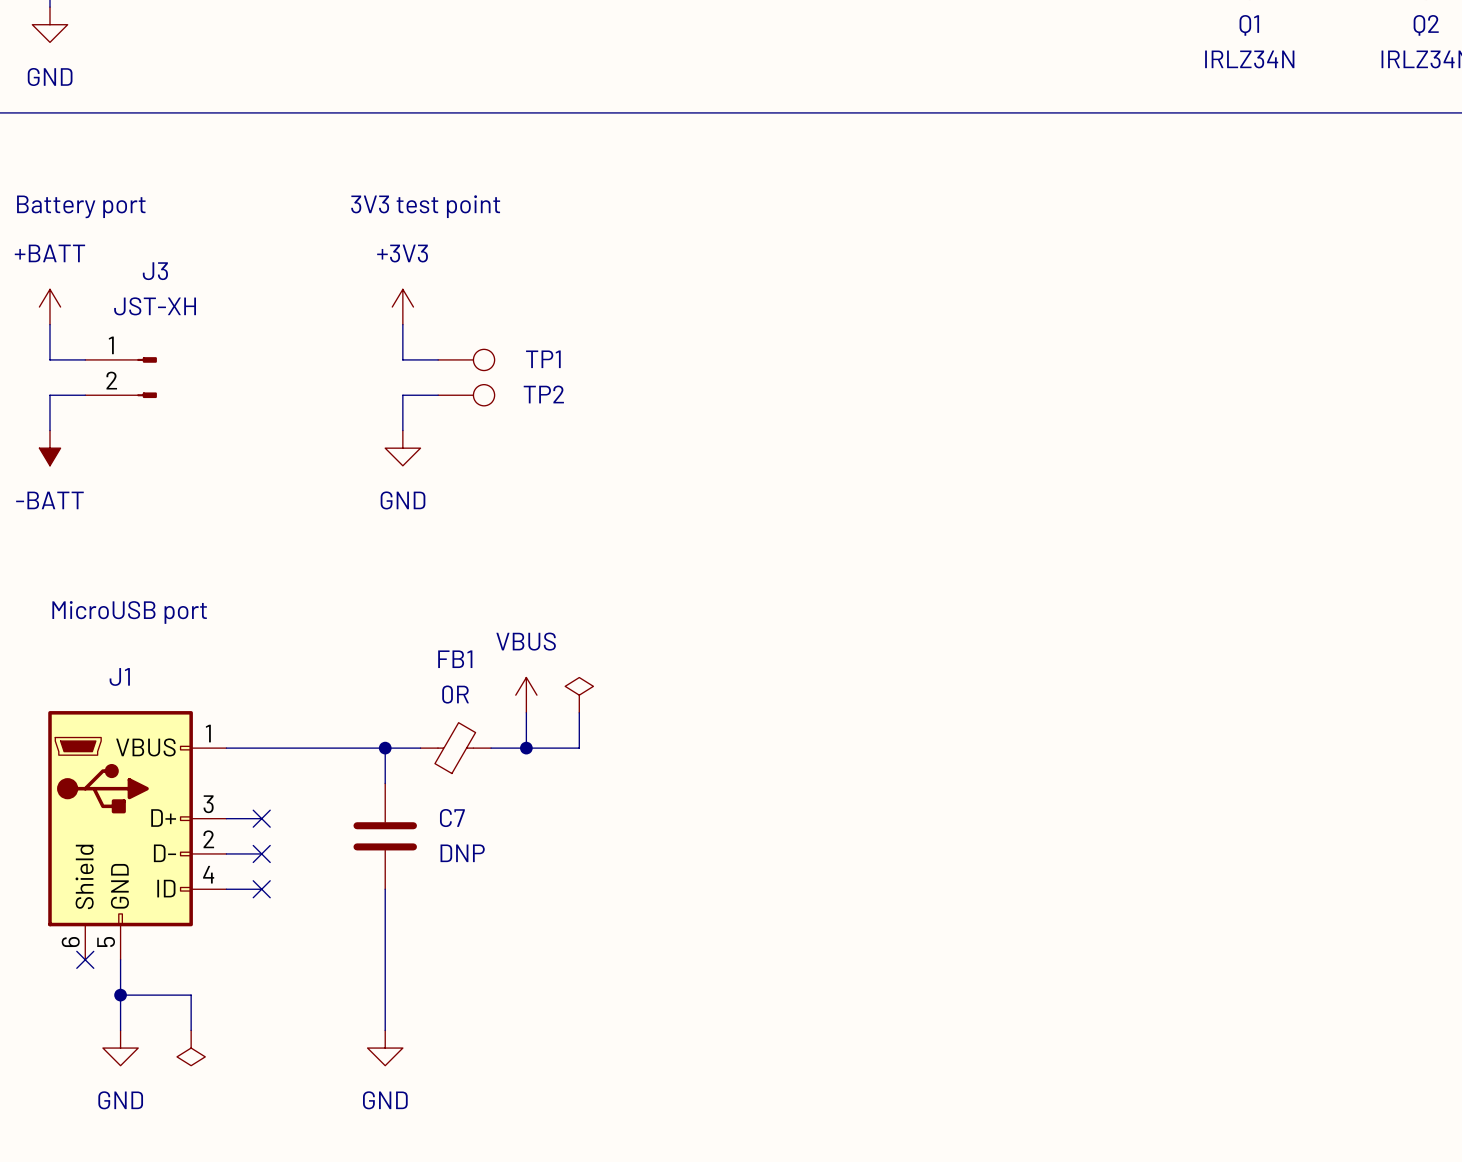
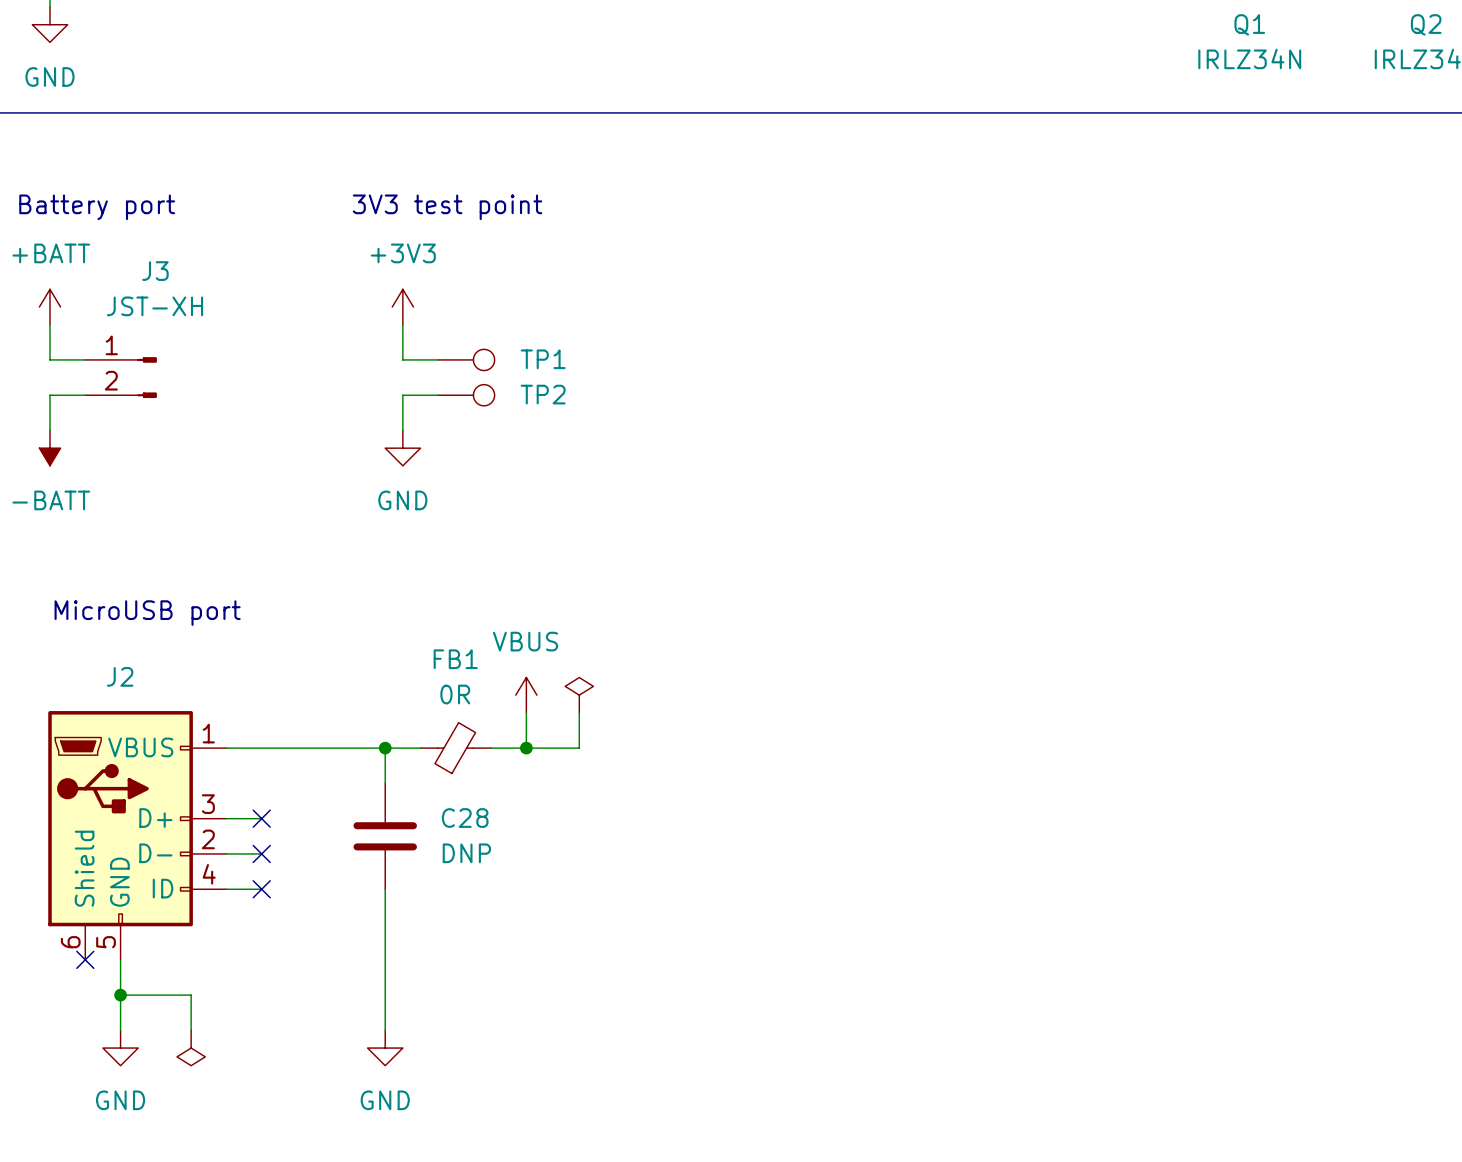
J1 name: J1 (119, 676) -> J2 (120, 676)
C7 name: C7 (452, 818) -> C28 (465, 818)

